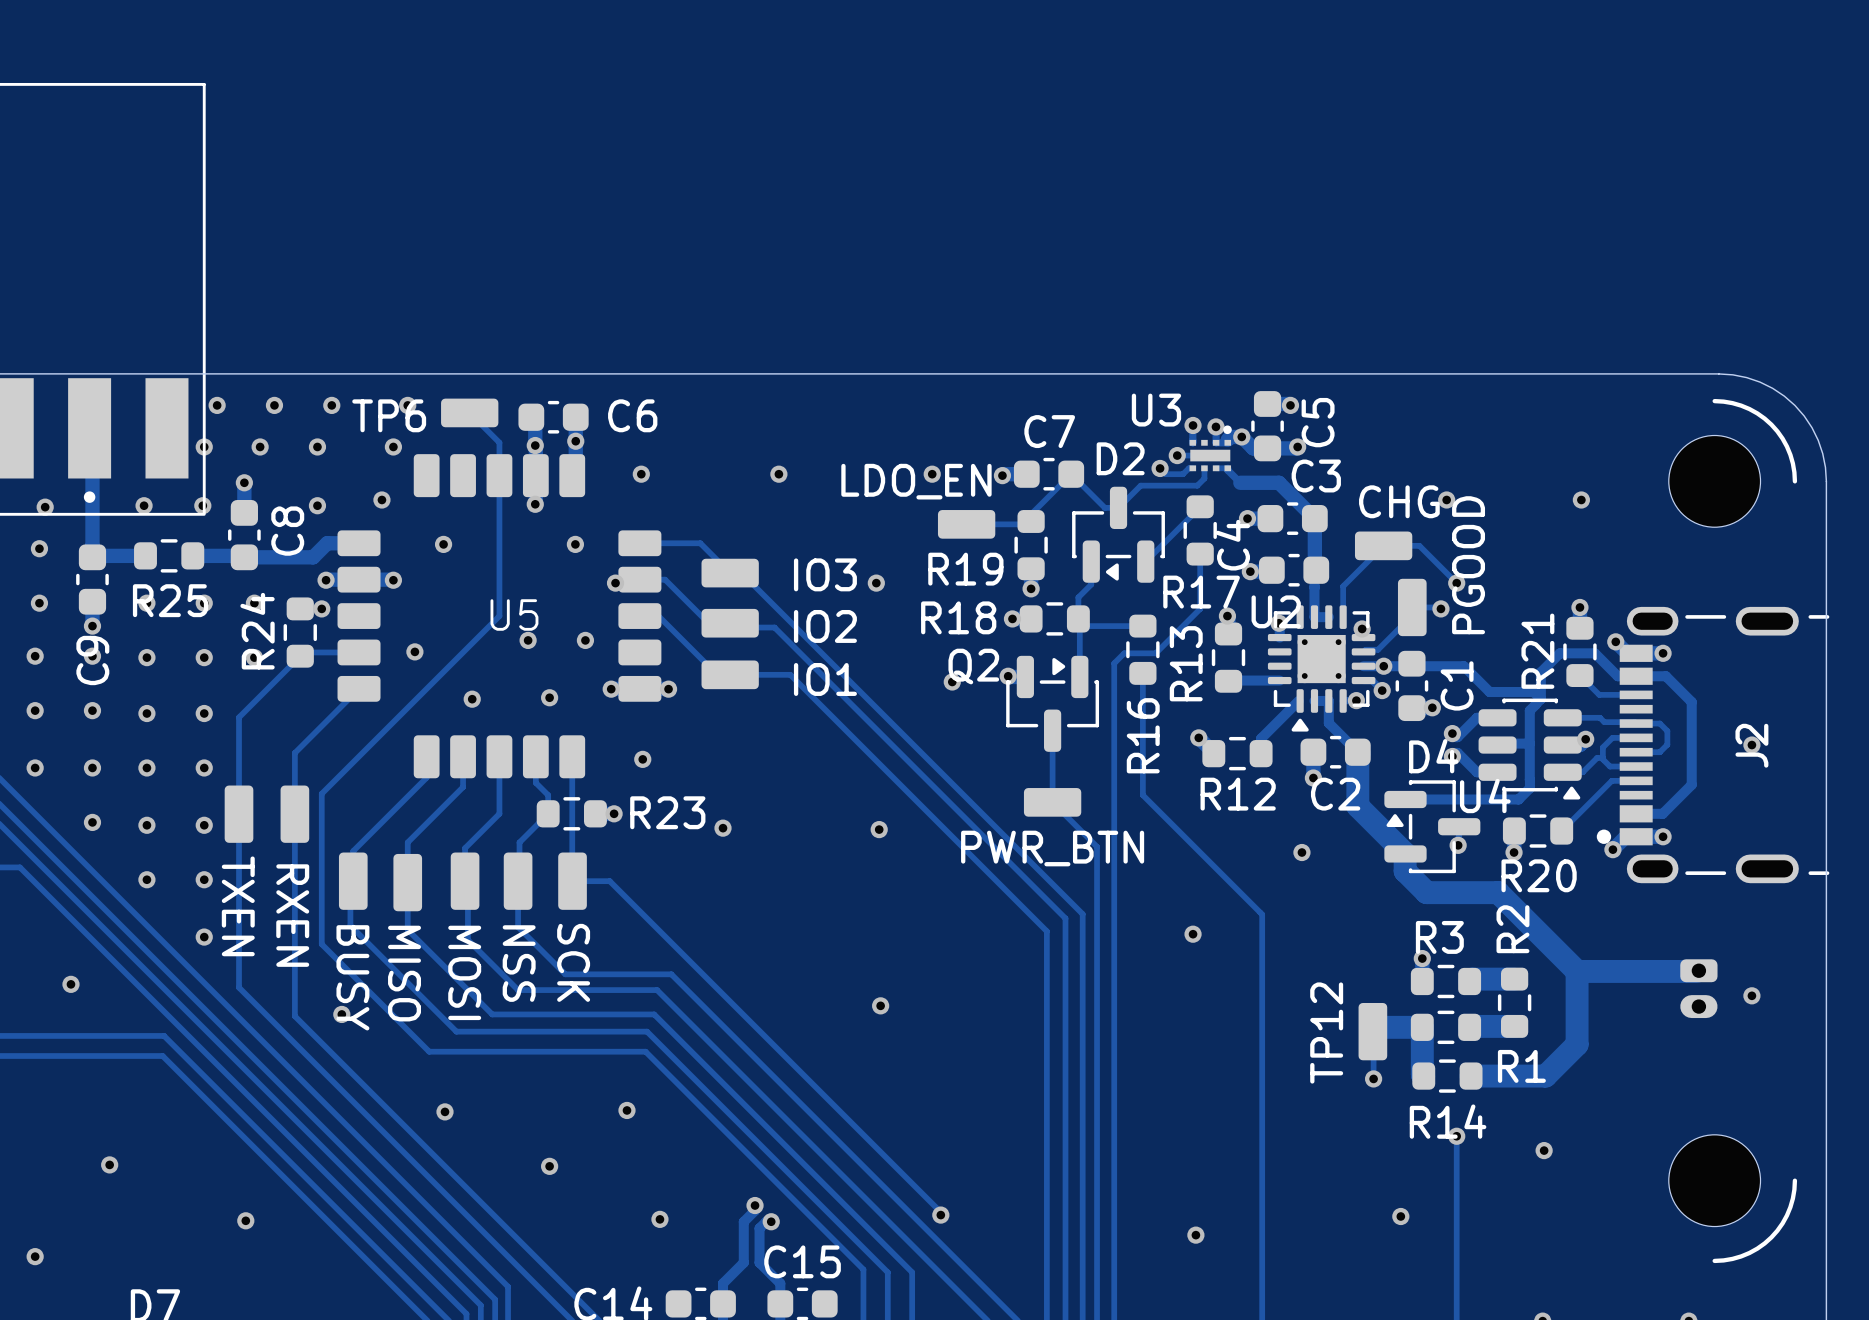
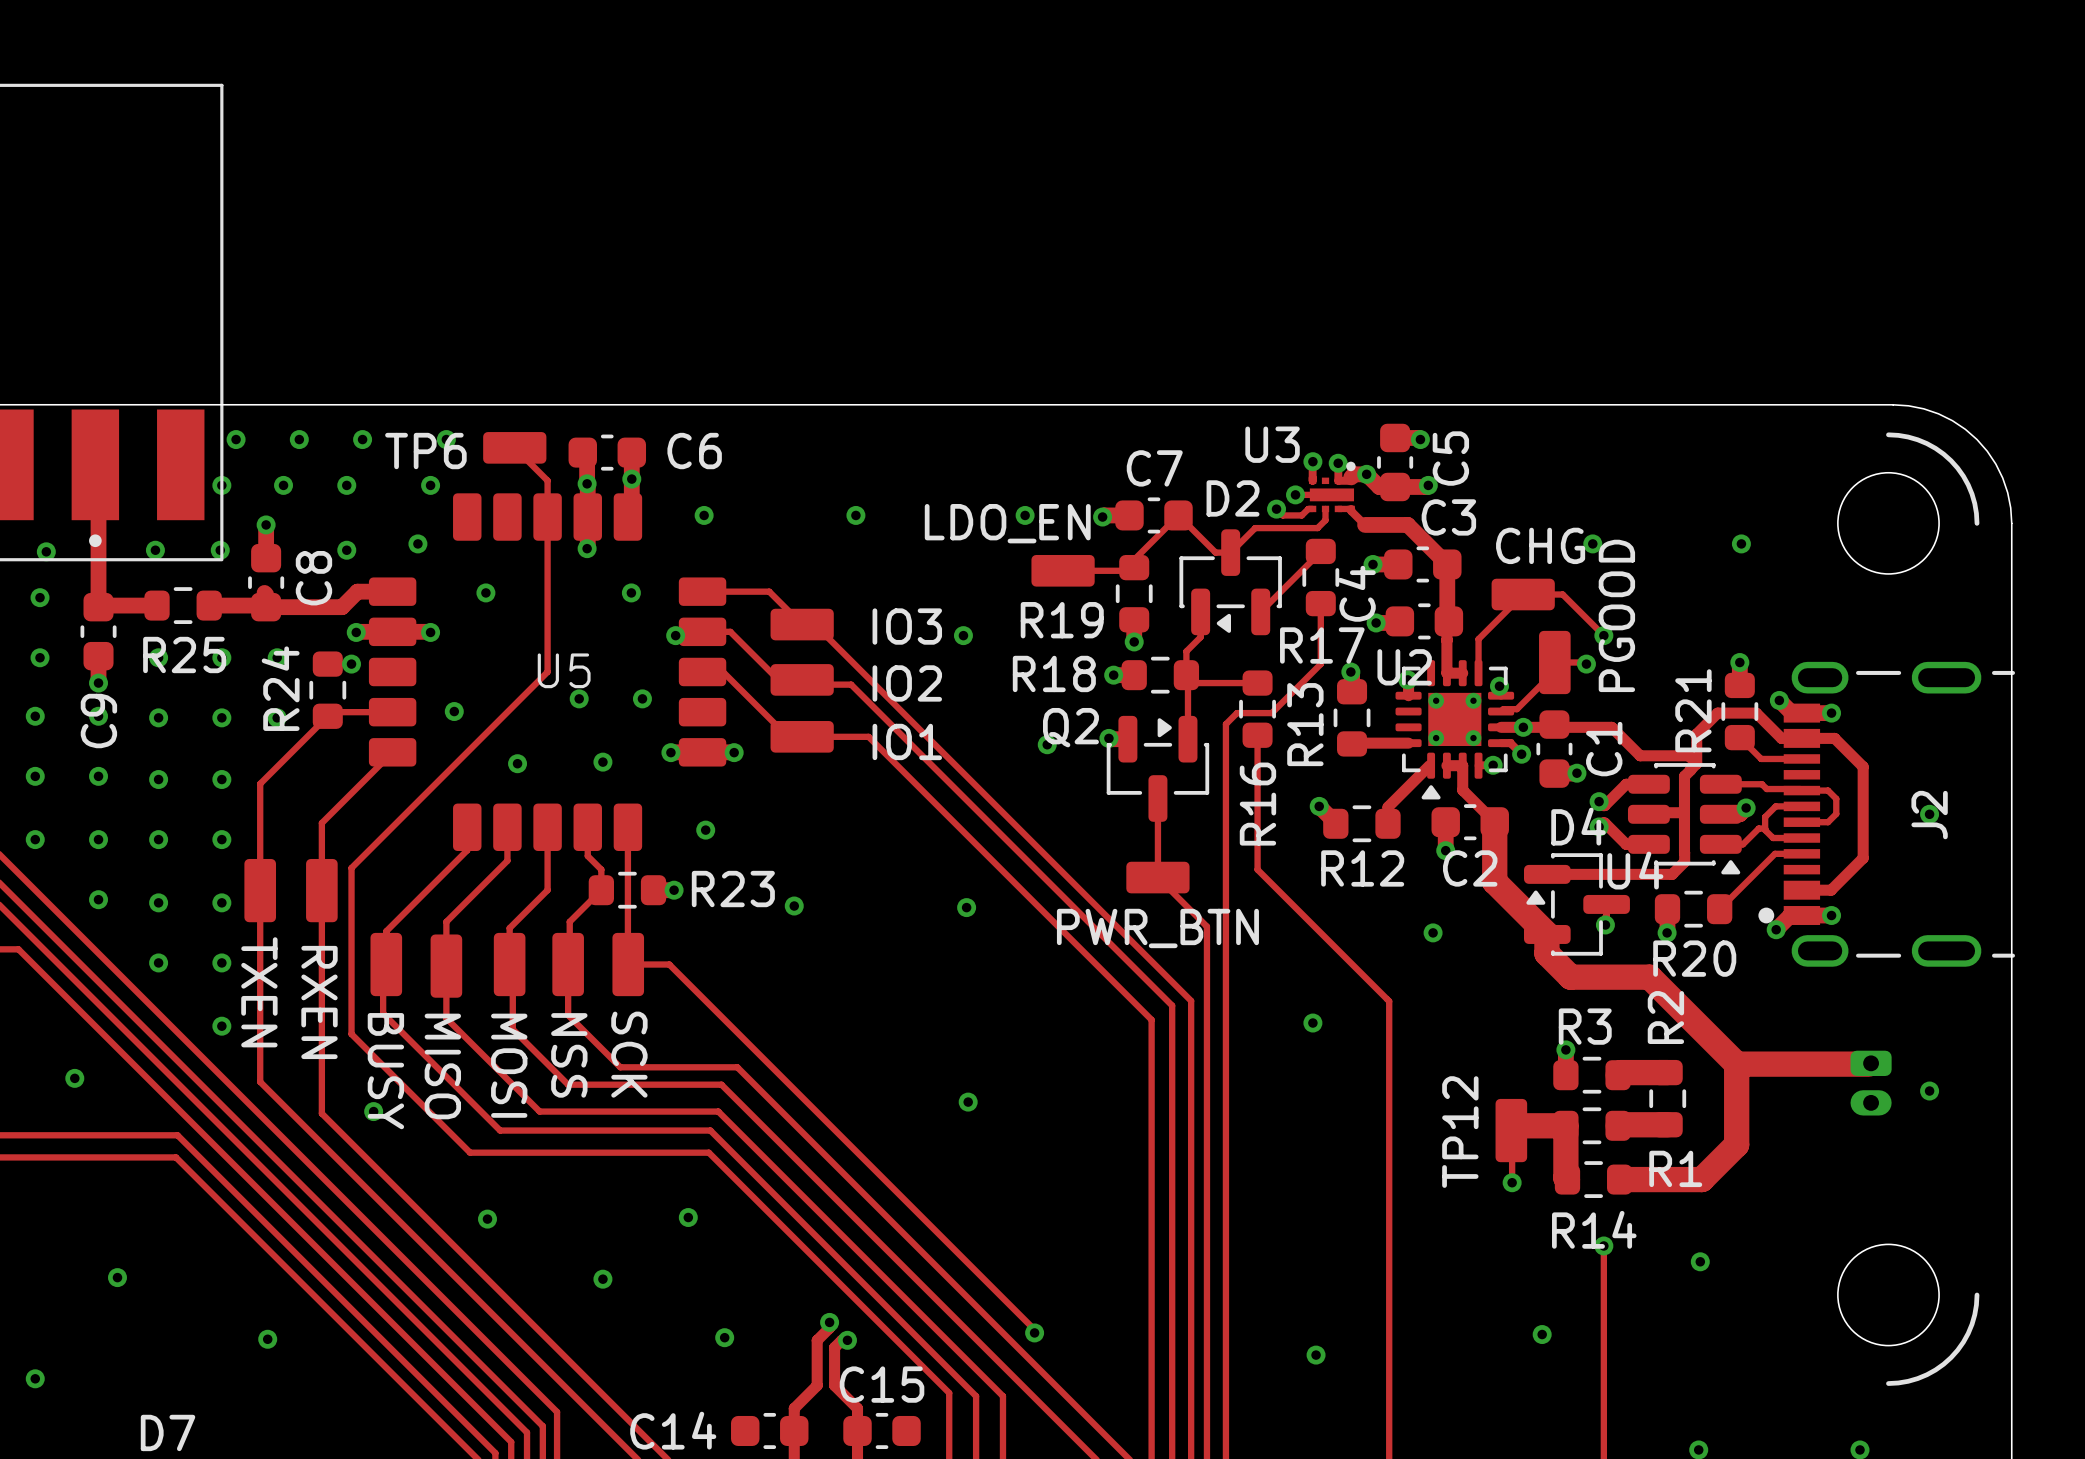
track: none -> (264, 592) (266, 594)

